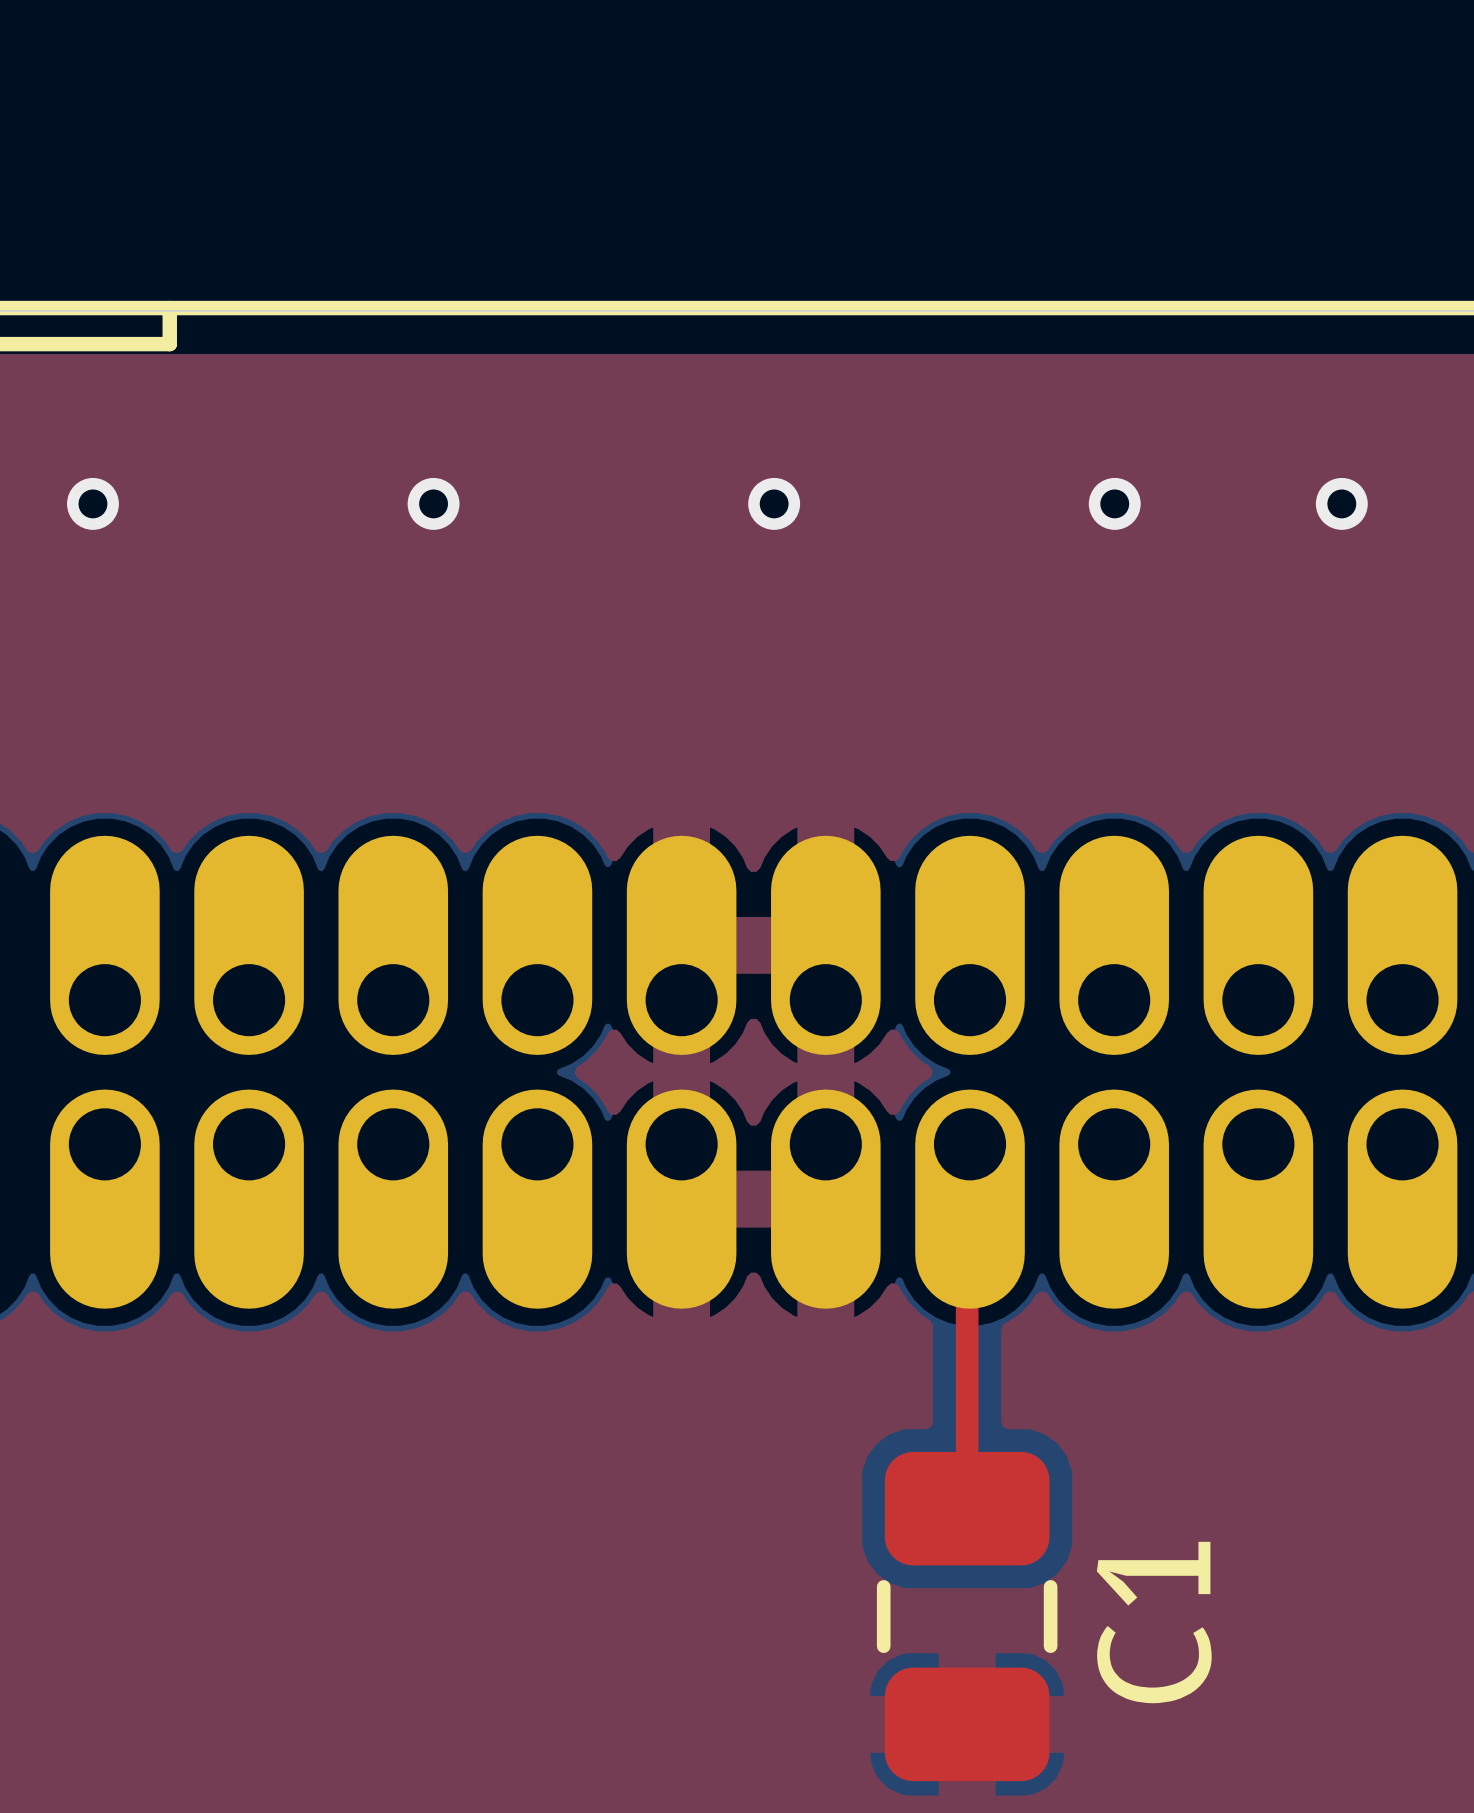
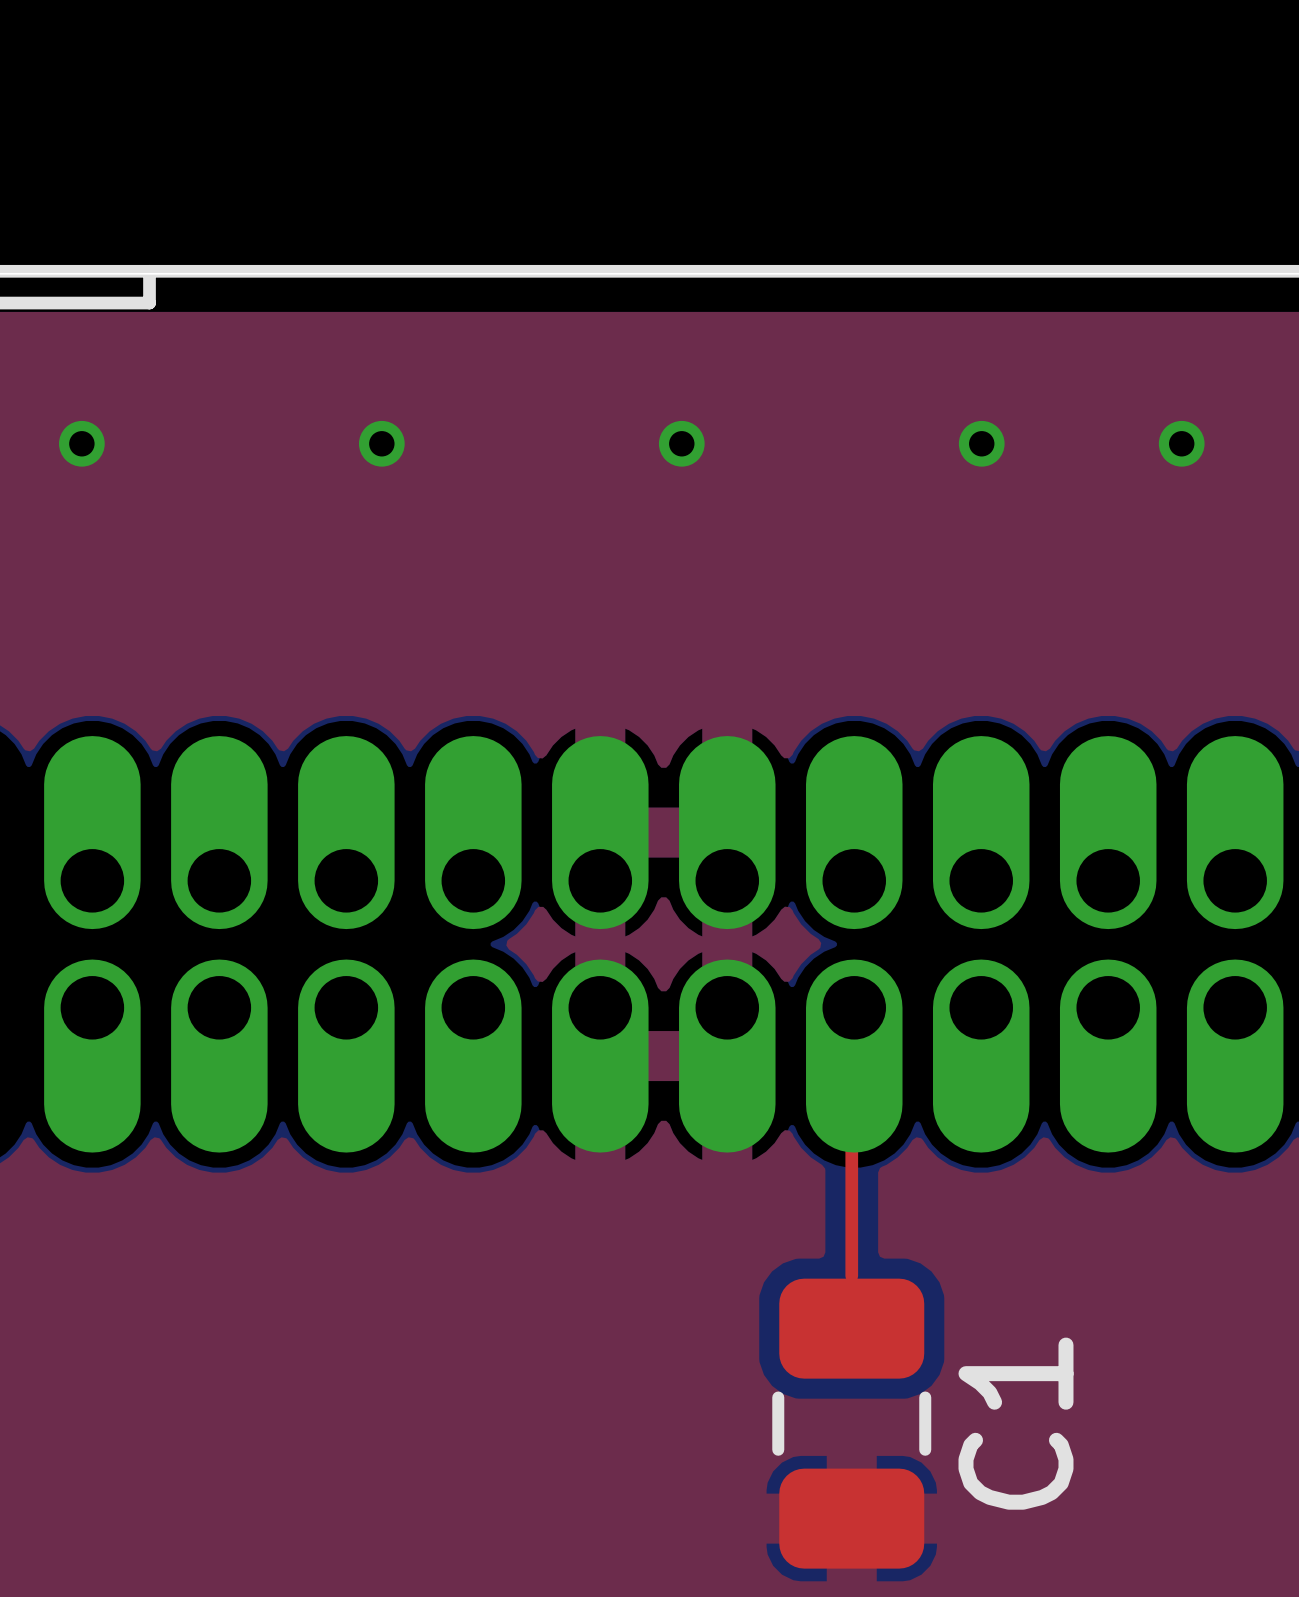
top track width: thick (970, 1144) (967, 1147) (967, 1449) -> thin (854, 1007) (851, 1010) (851, 1276)

